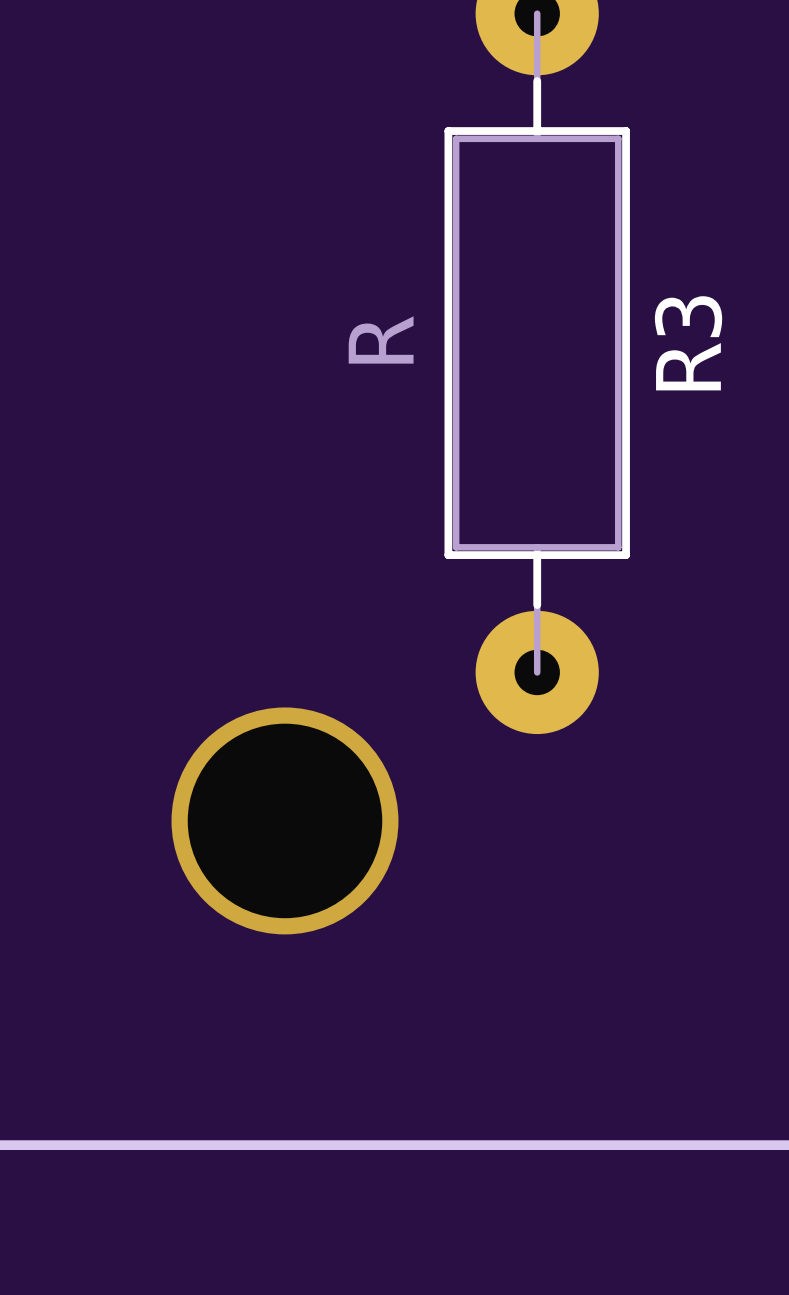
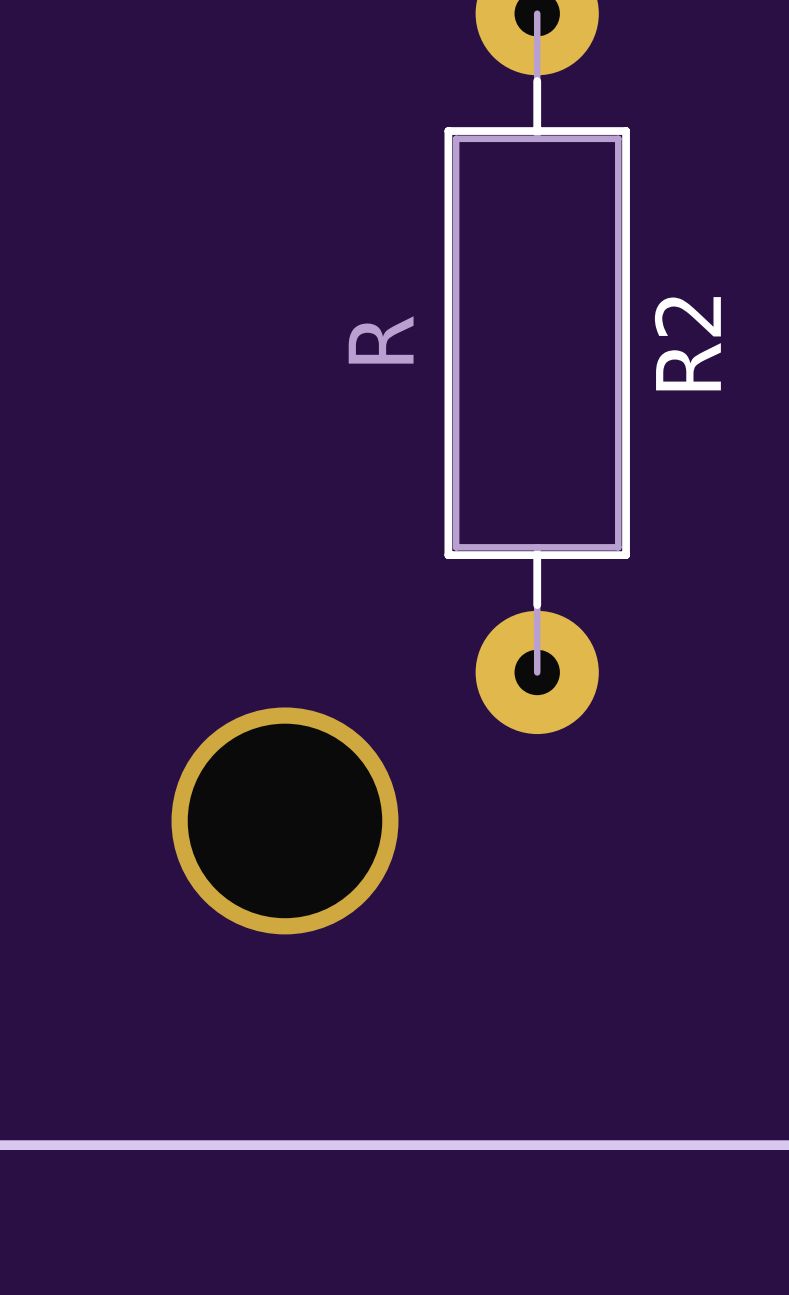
R3 name: R3 (688, 343) -> R2 (687, 343)

